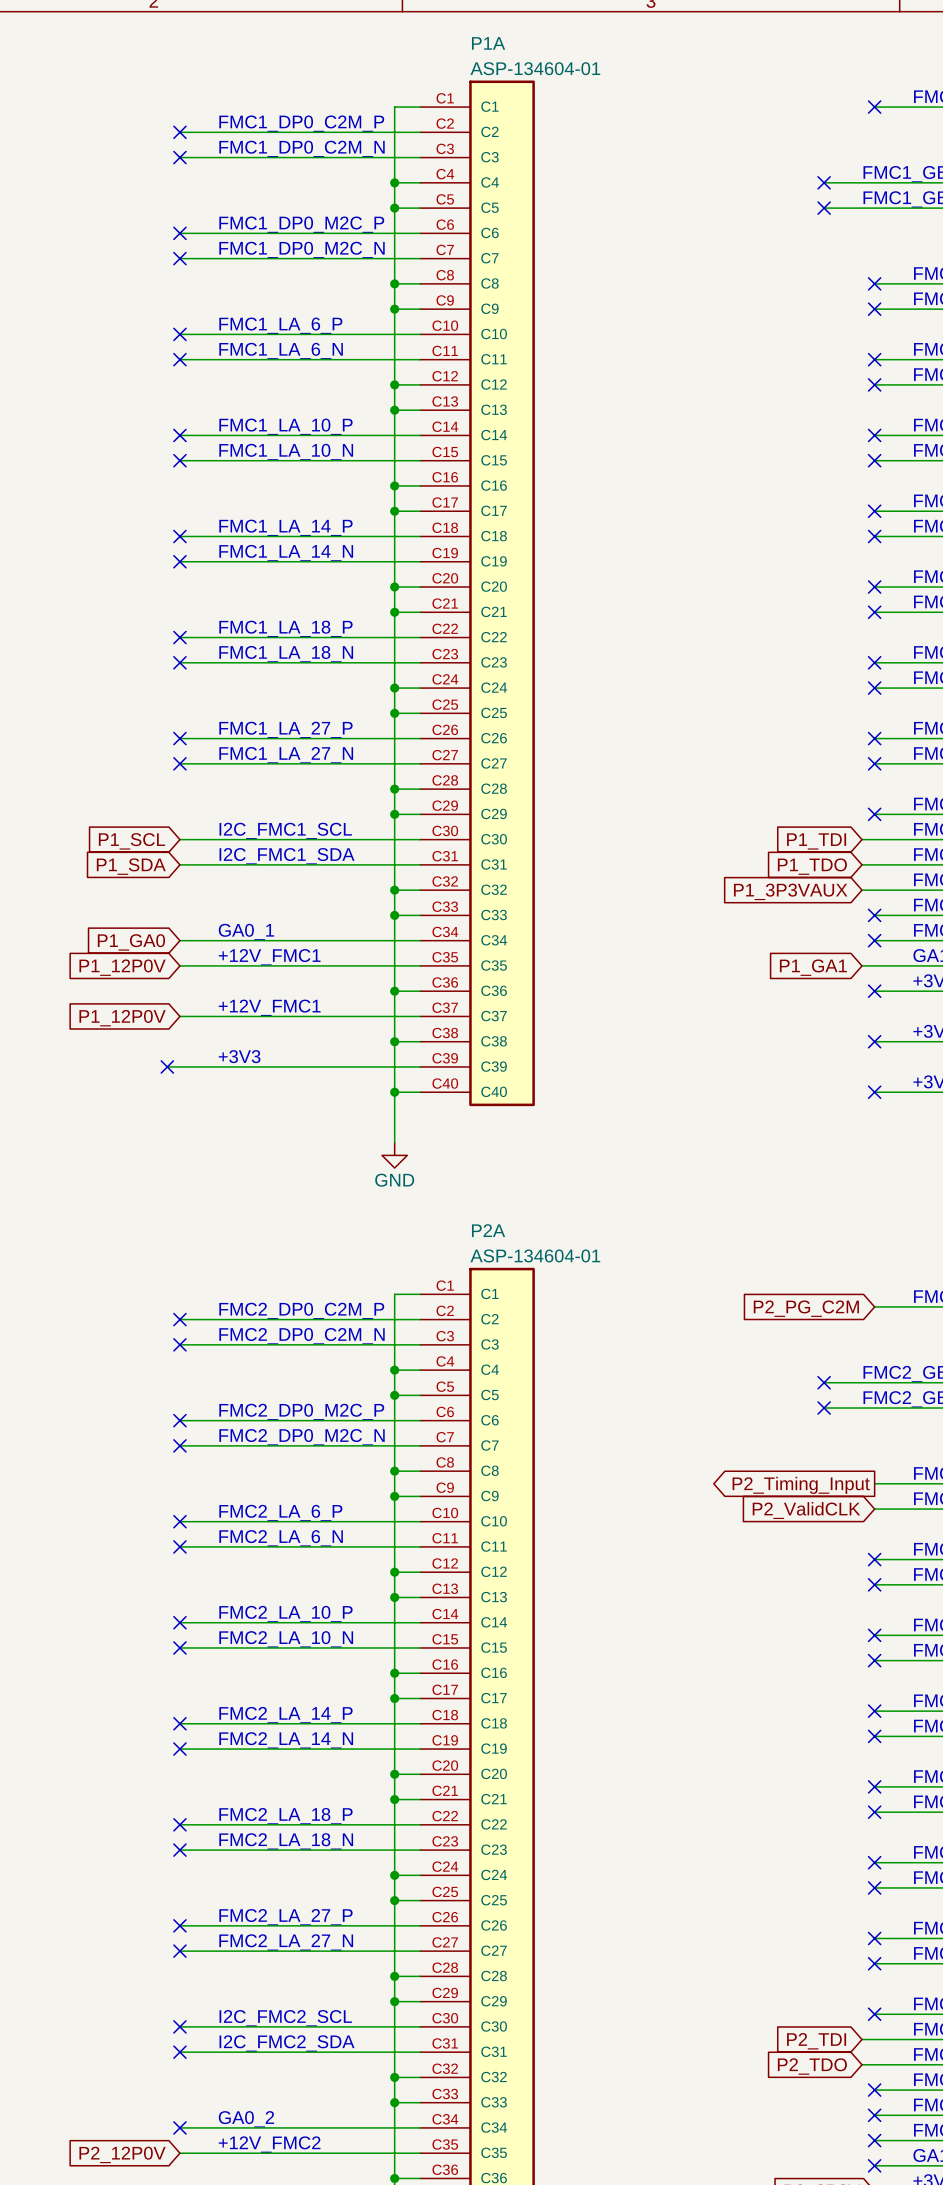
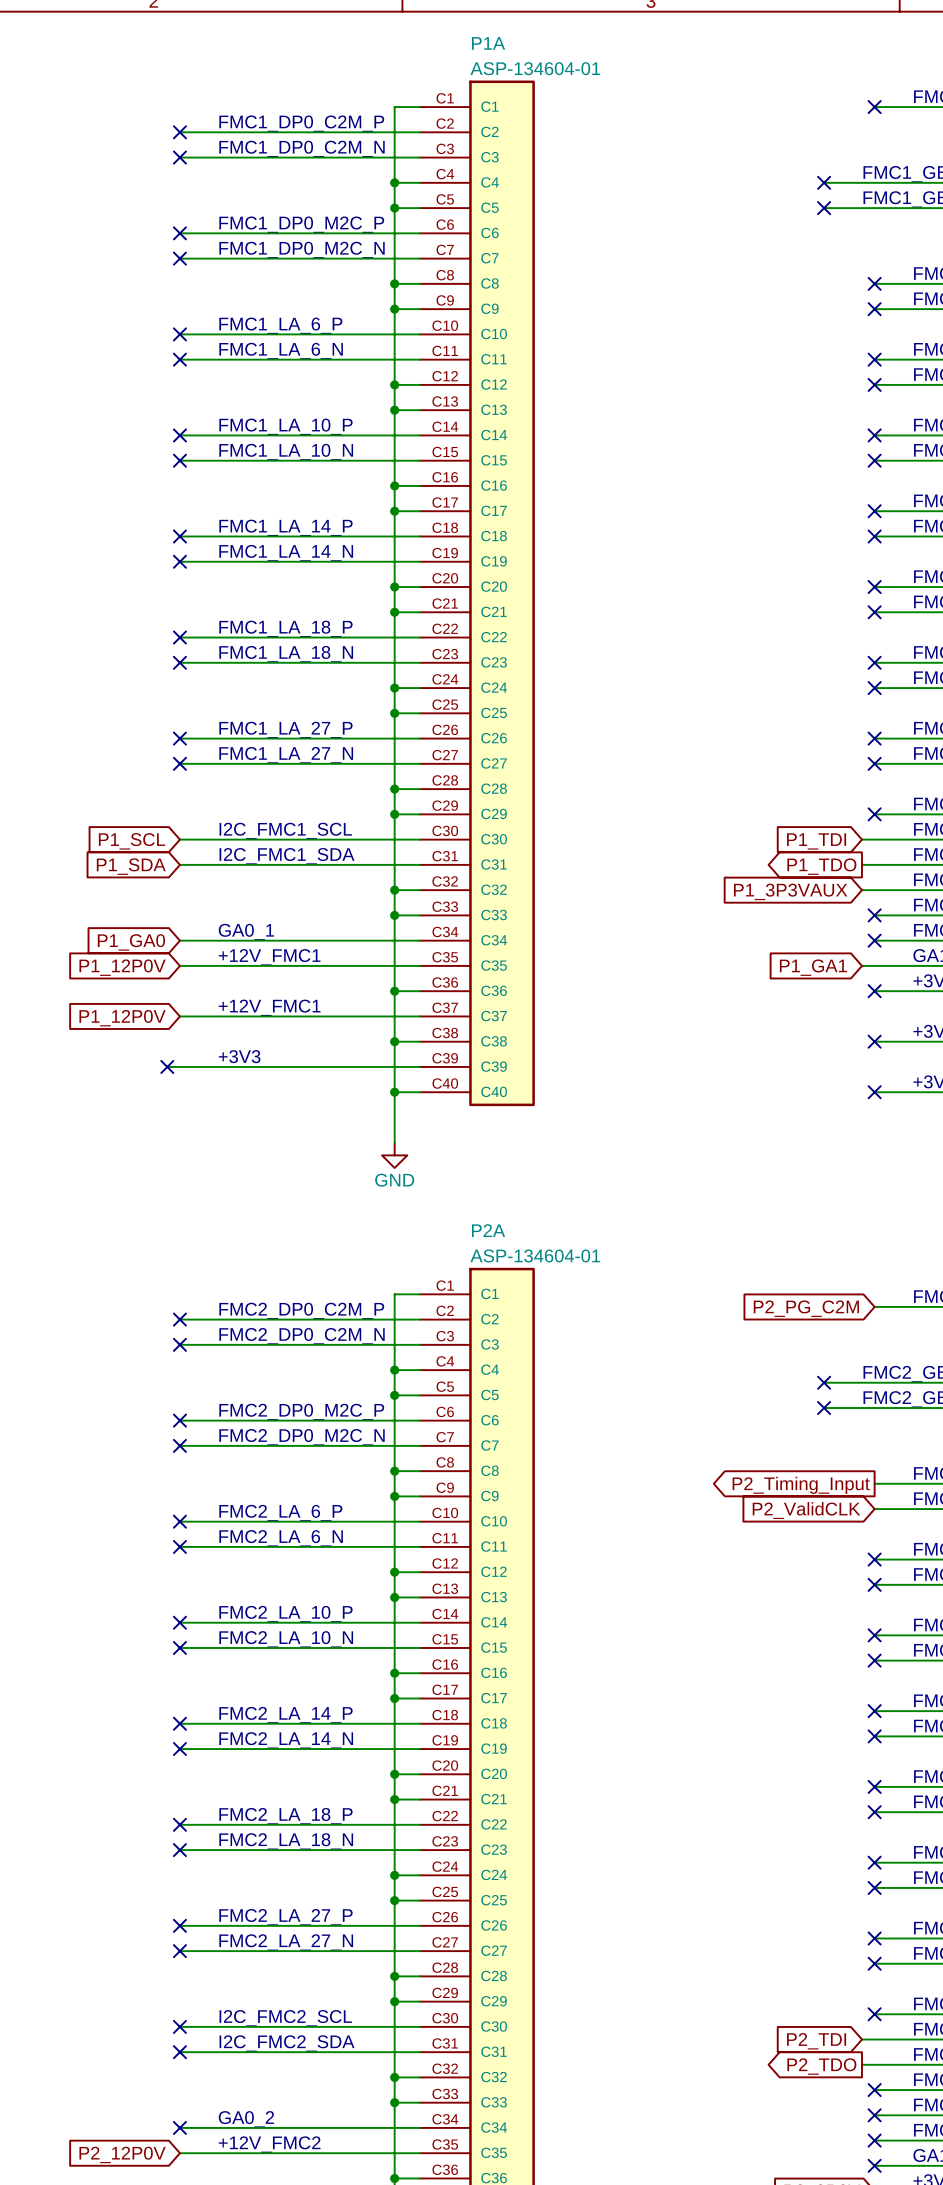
global label shape: input (812, 866) -> output (821, 866)
global label shape: input (812, 2066) -> output (821, 2066)

